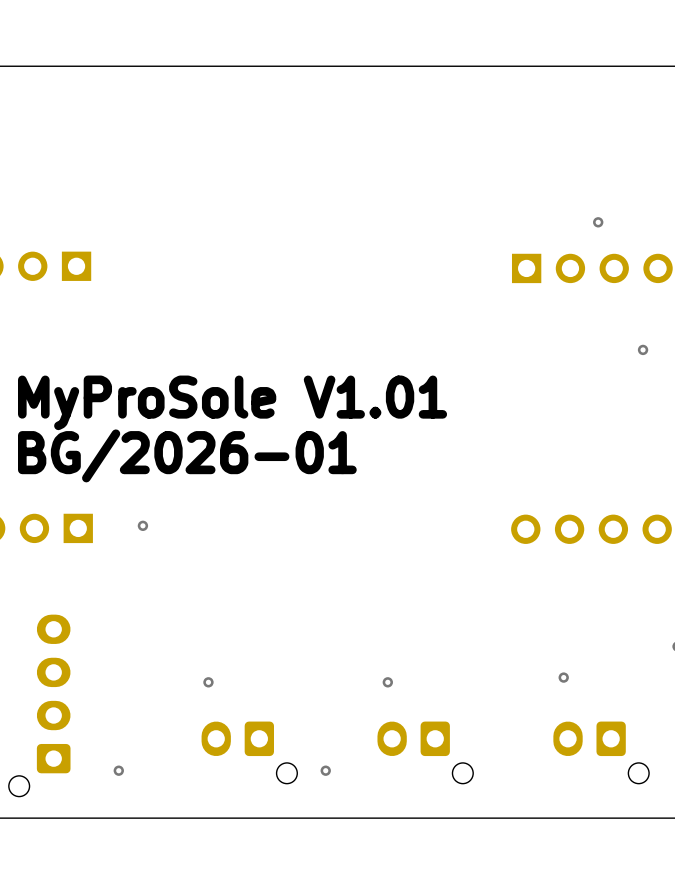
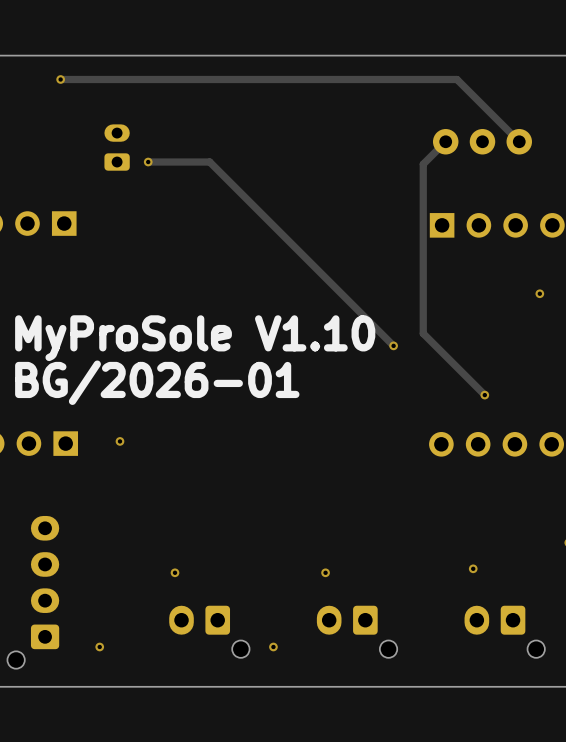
track: none -> (60, 79) (457, 79) (519, 141)
via: none -> (60, 79)
track: none -> (445, 141) (423, 164) (423, 333) (484, 395)
part: none -> (482, 141)
part: none -> (117, 147)
track: none -> (148, 162) (209, 162) (393, 345)
via: none -> (148, 162)
via: (598, 222) -> none
text: MyProSole V1.01 (232, 402) -> MyProSole V1.10 (195, 338)
via: none -> (393, 345)
via: none -> (484, 395)

